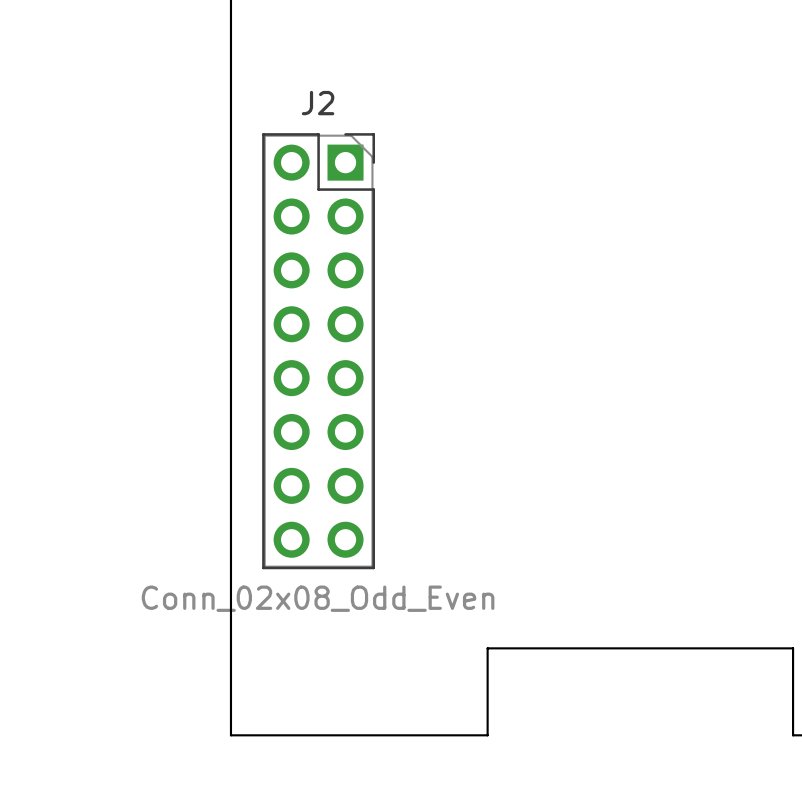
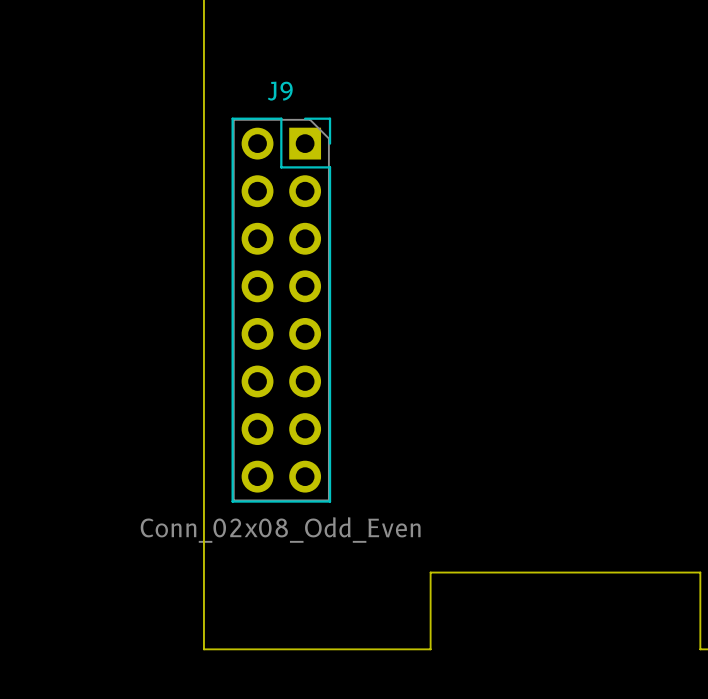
J2 name: J2 (318, 103) -> J9 (280, 91)

